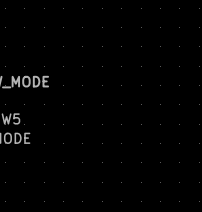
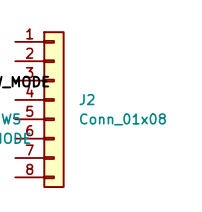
J2: none -> Conn_01x08 (39, 109)

